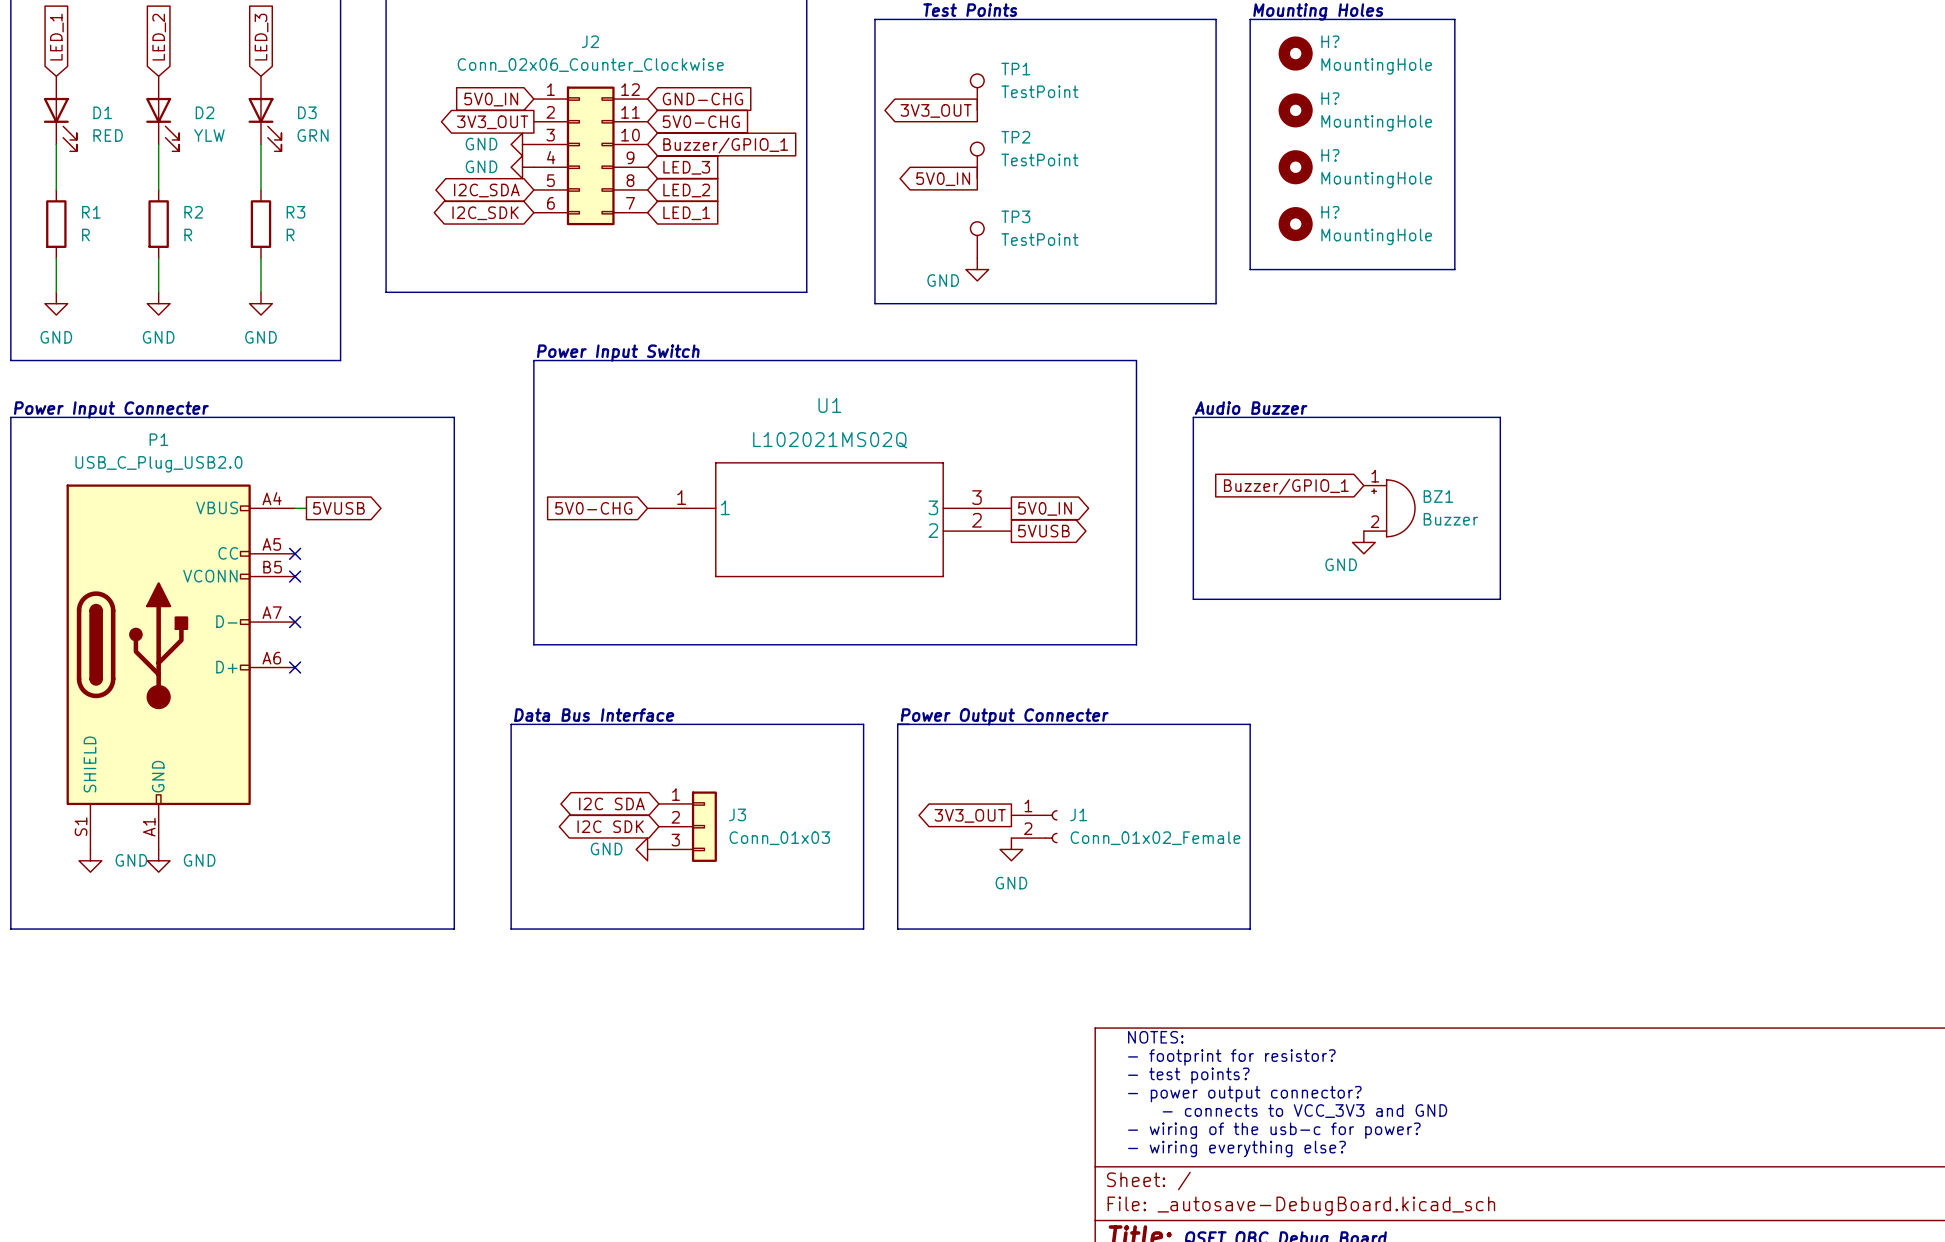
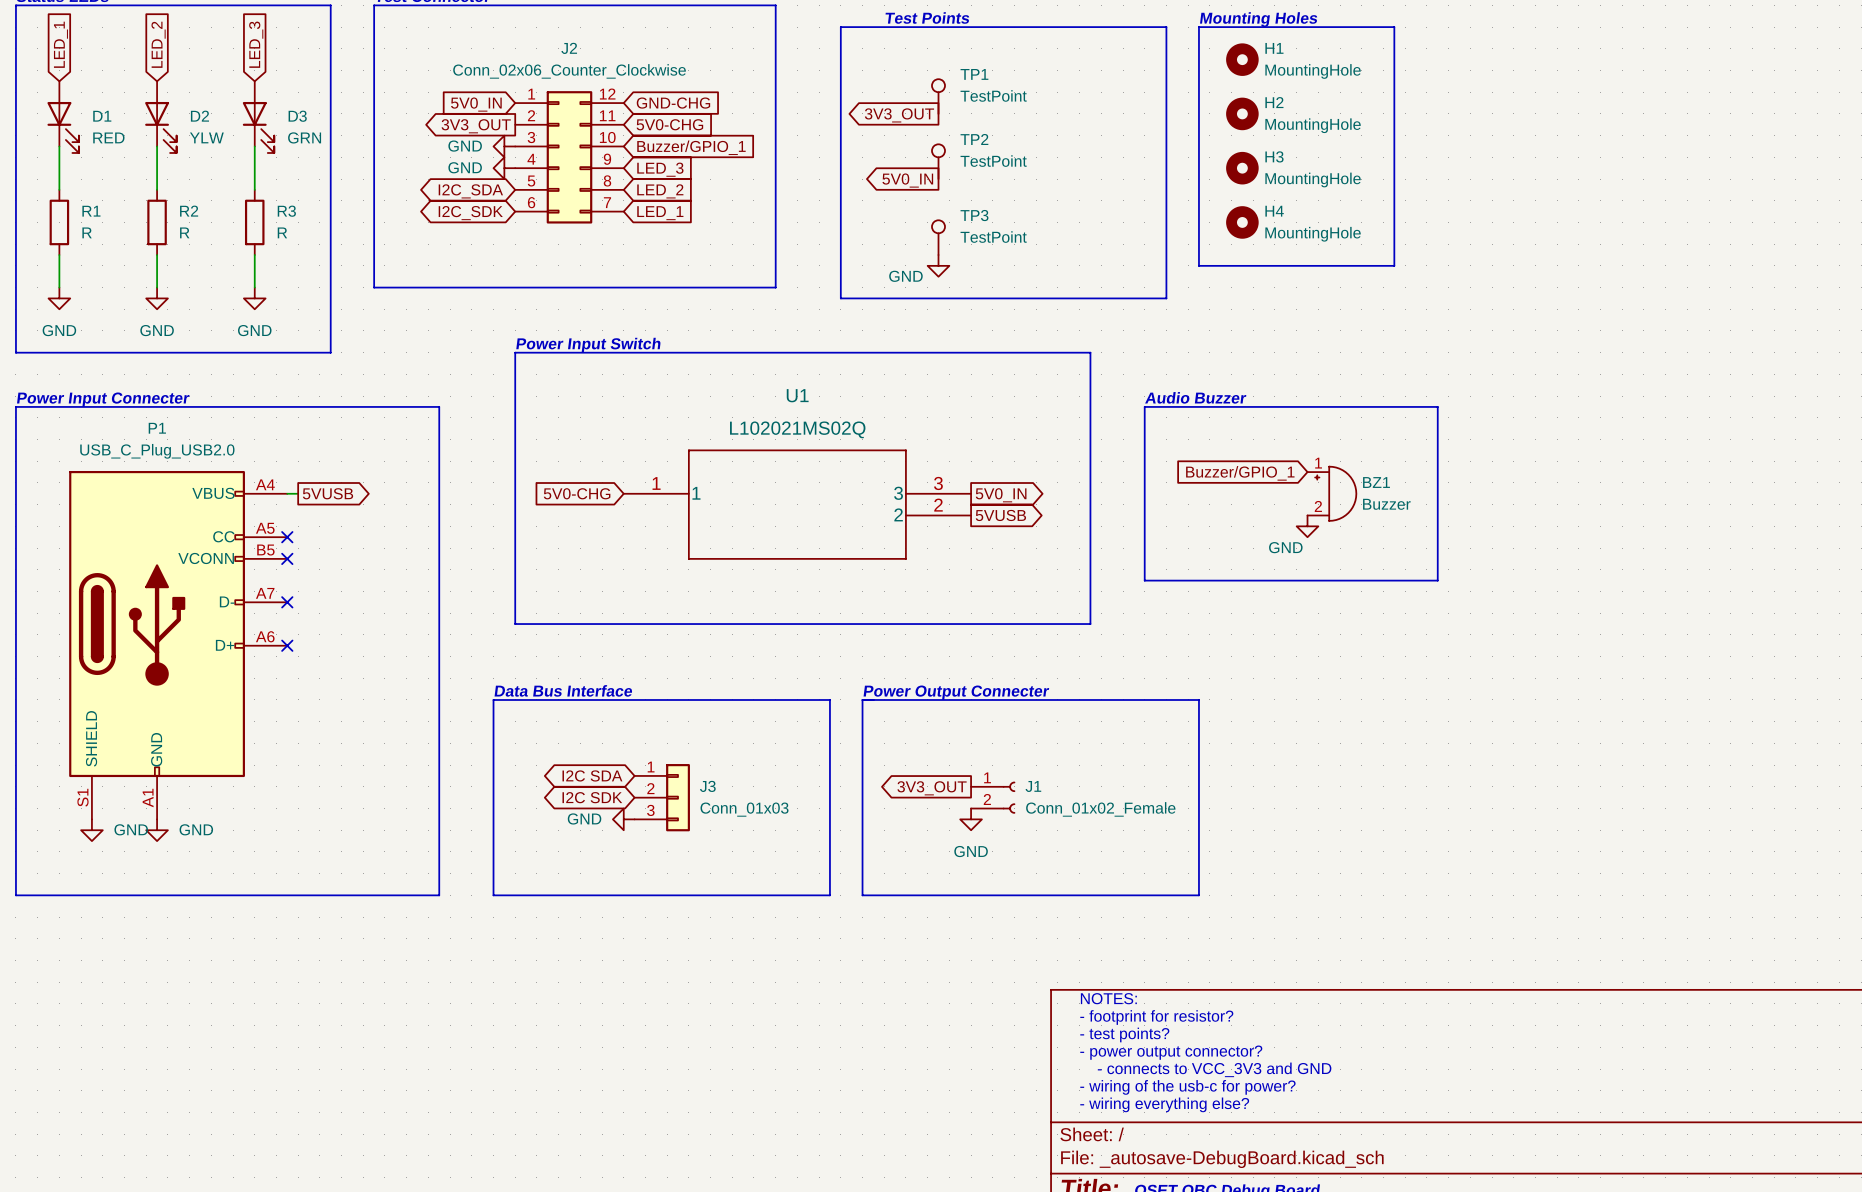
H? name: H? (1330, 41) -> H1 (1274, 48)
H? name: H? (1330, 98) -> H2 (1274, 102)
H? name: H? (1330, 155) -> H3 (1274, 156)
H? name: H? (1330, 212) -> H4 (1274, 211)

